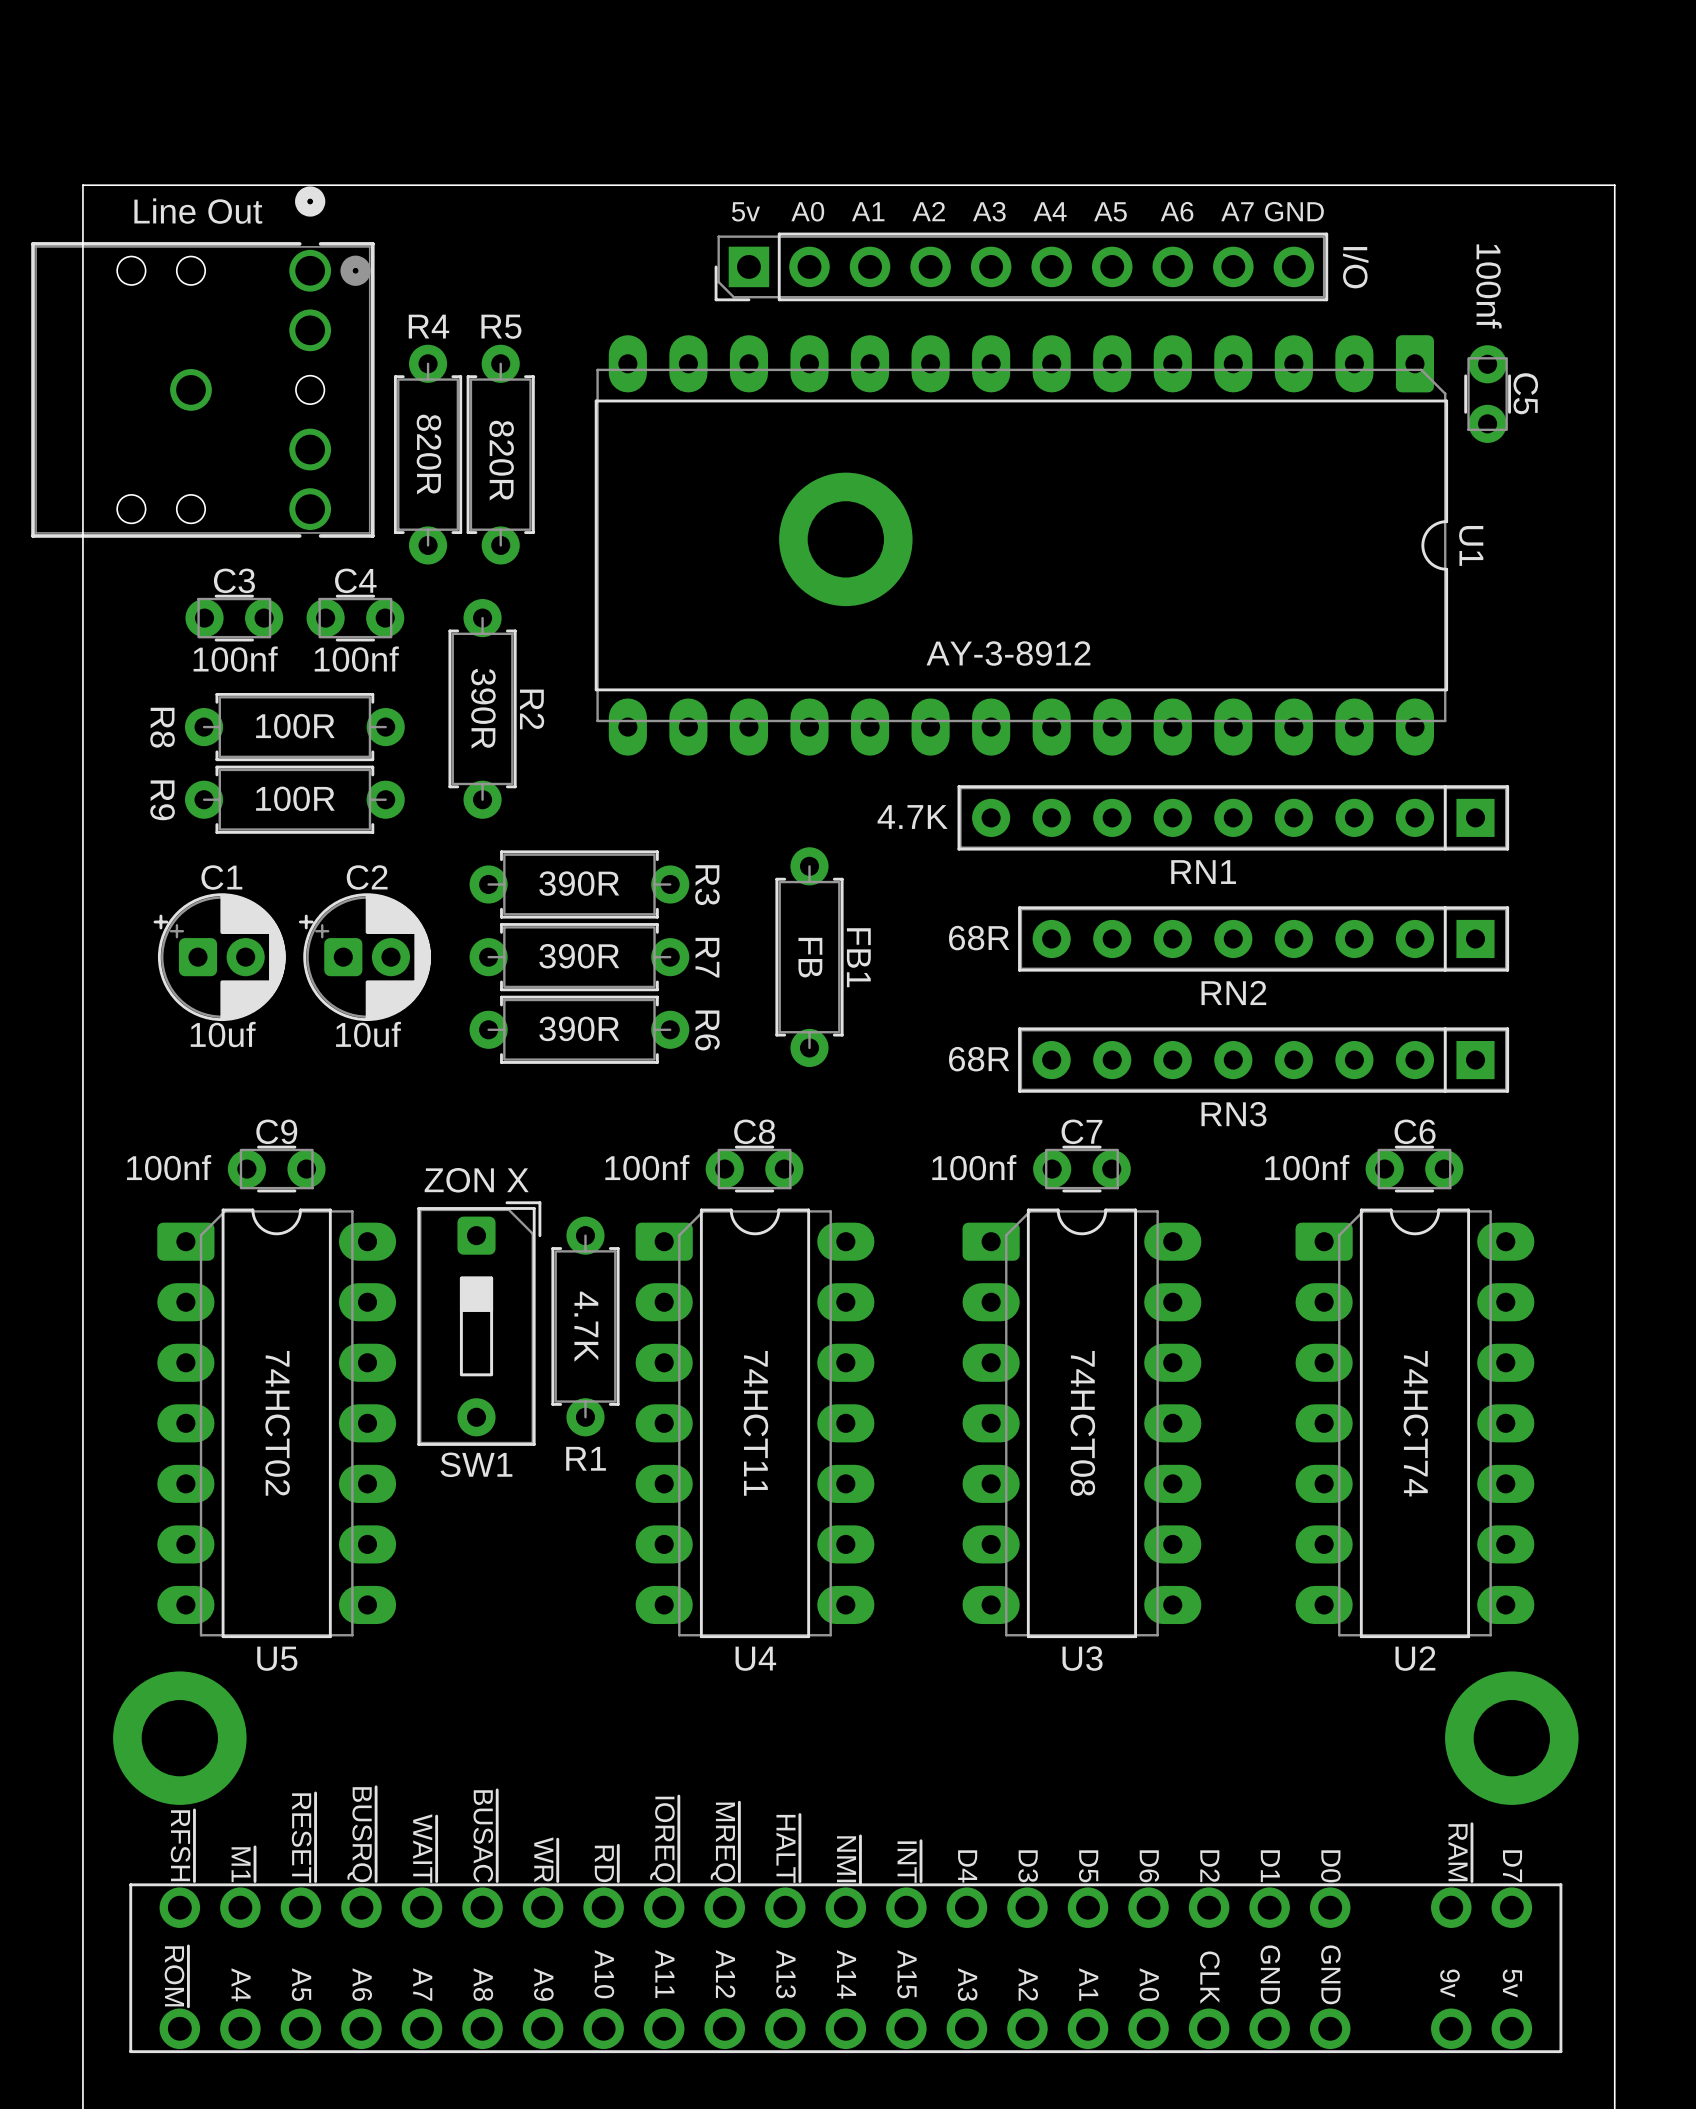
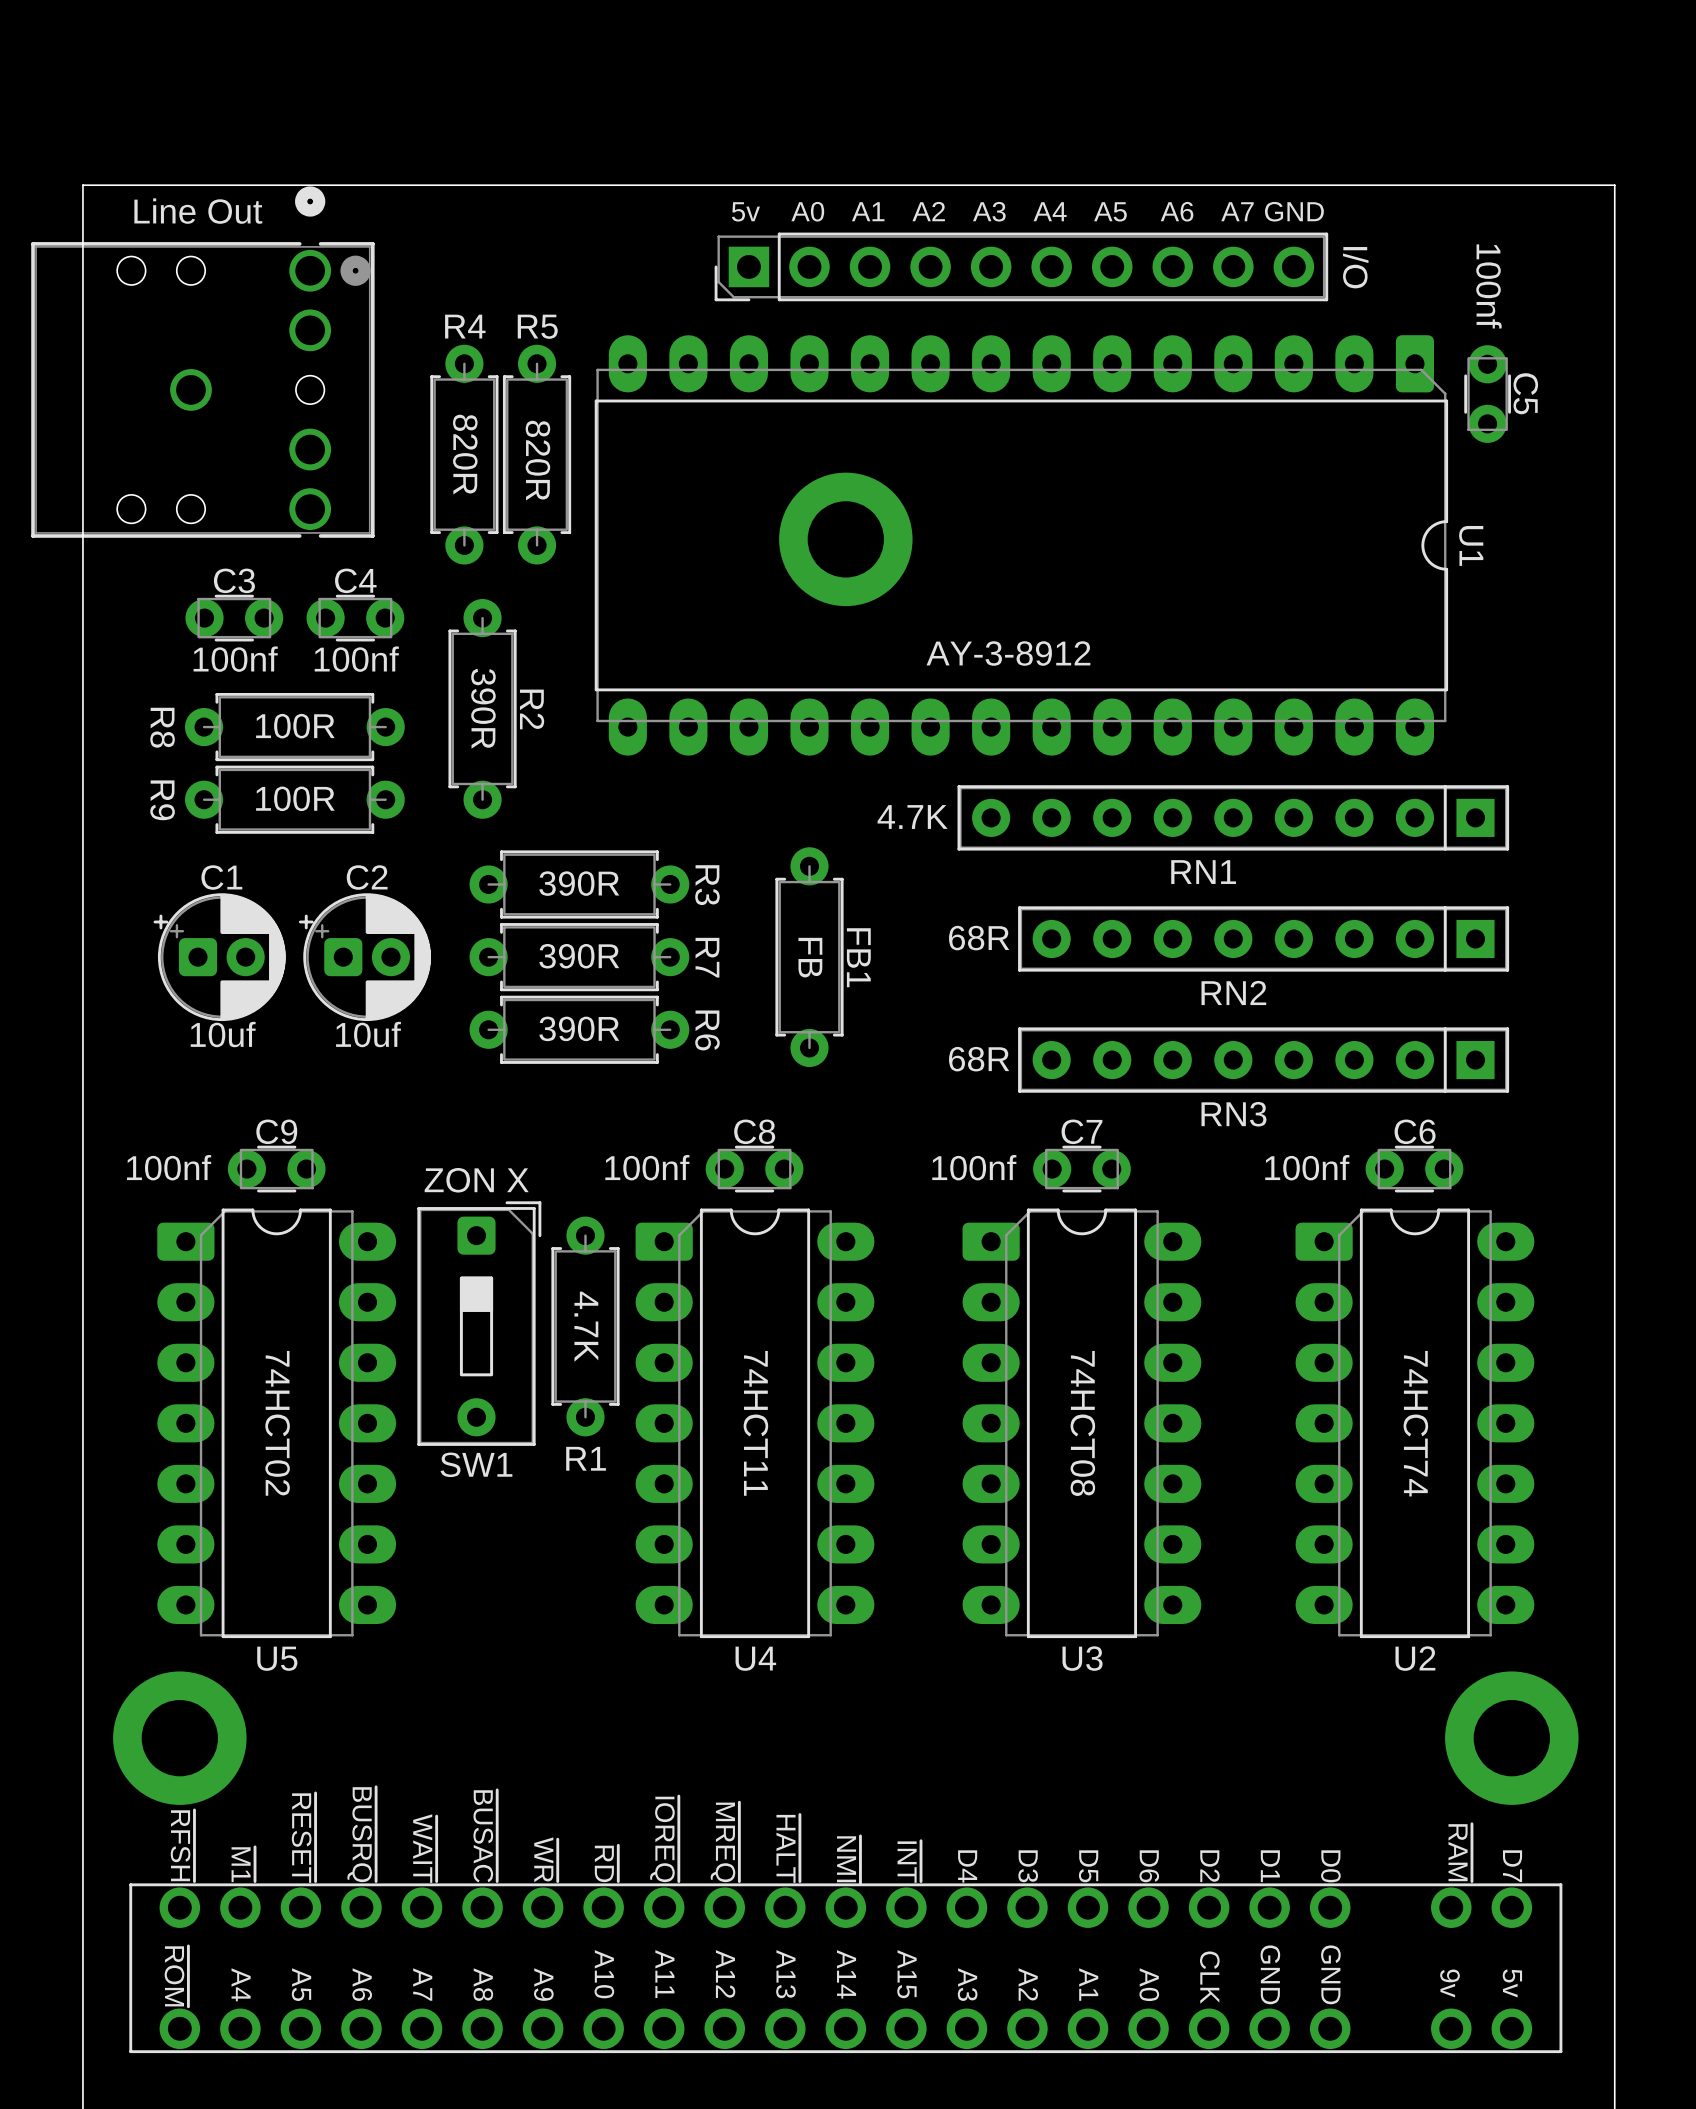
R4 position: (428, 454) -> (464, 454)
R5 position: (500, 454) -> (537, 454)

